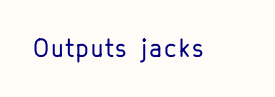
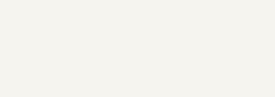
text: Outputs jacks (118, 50) -> none

